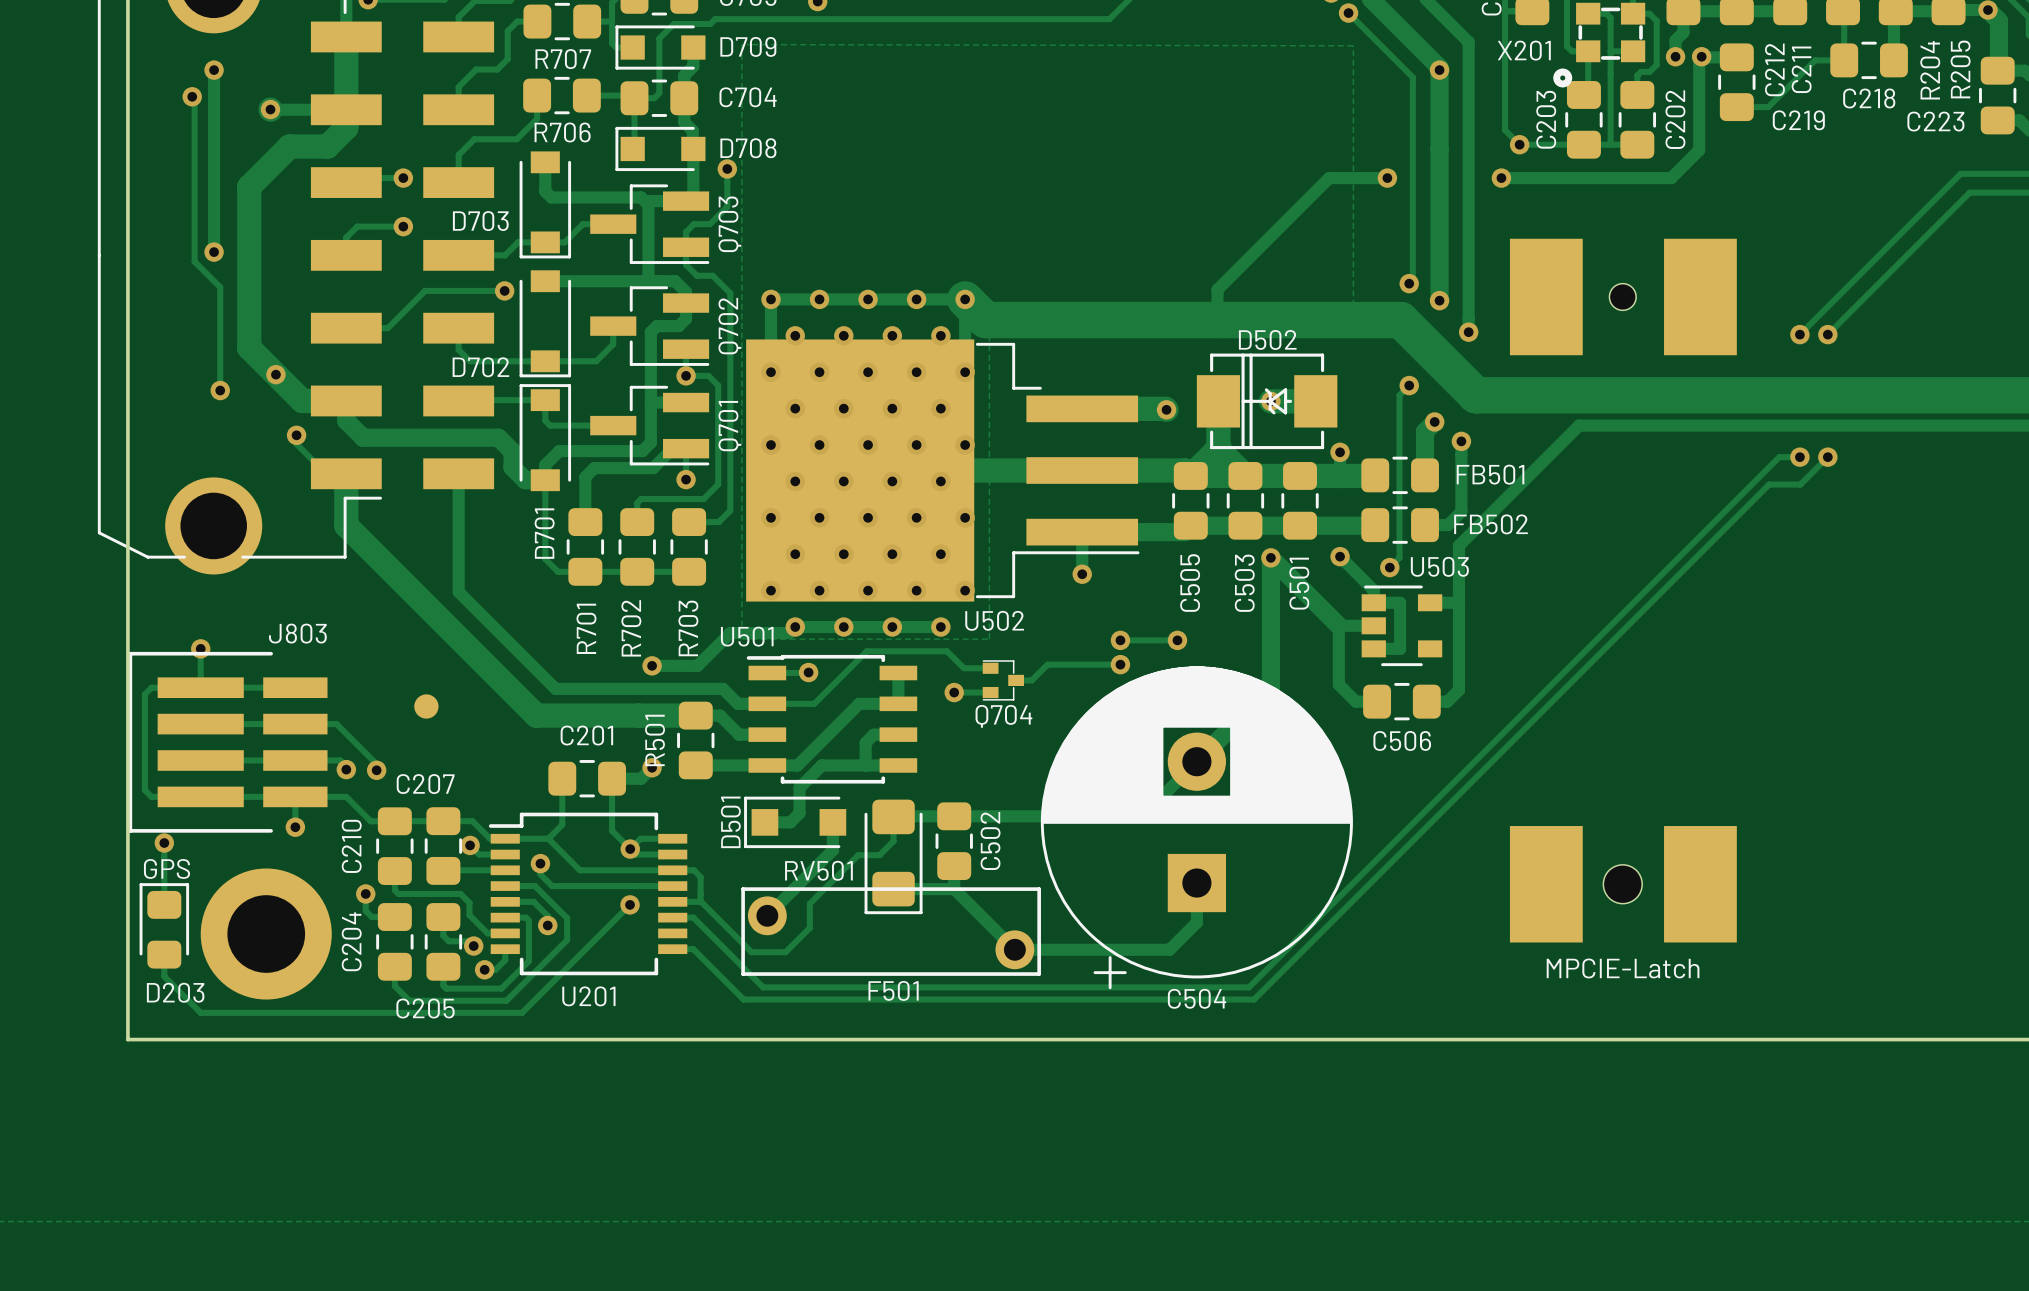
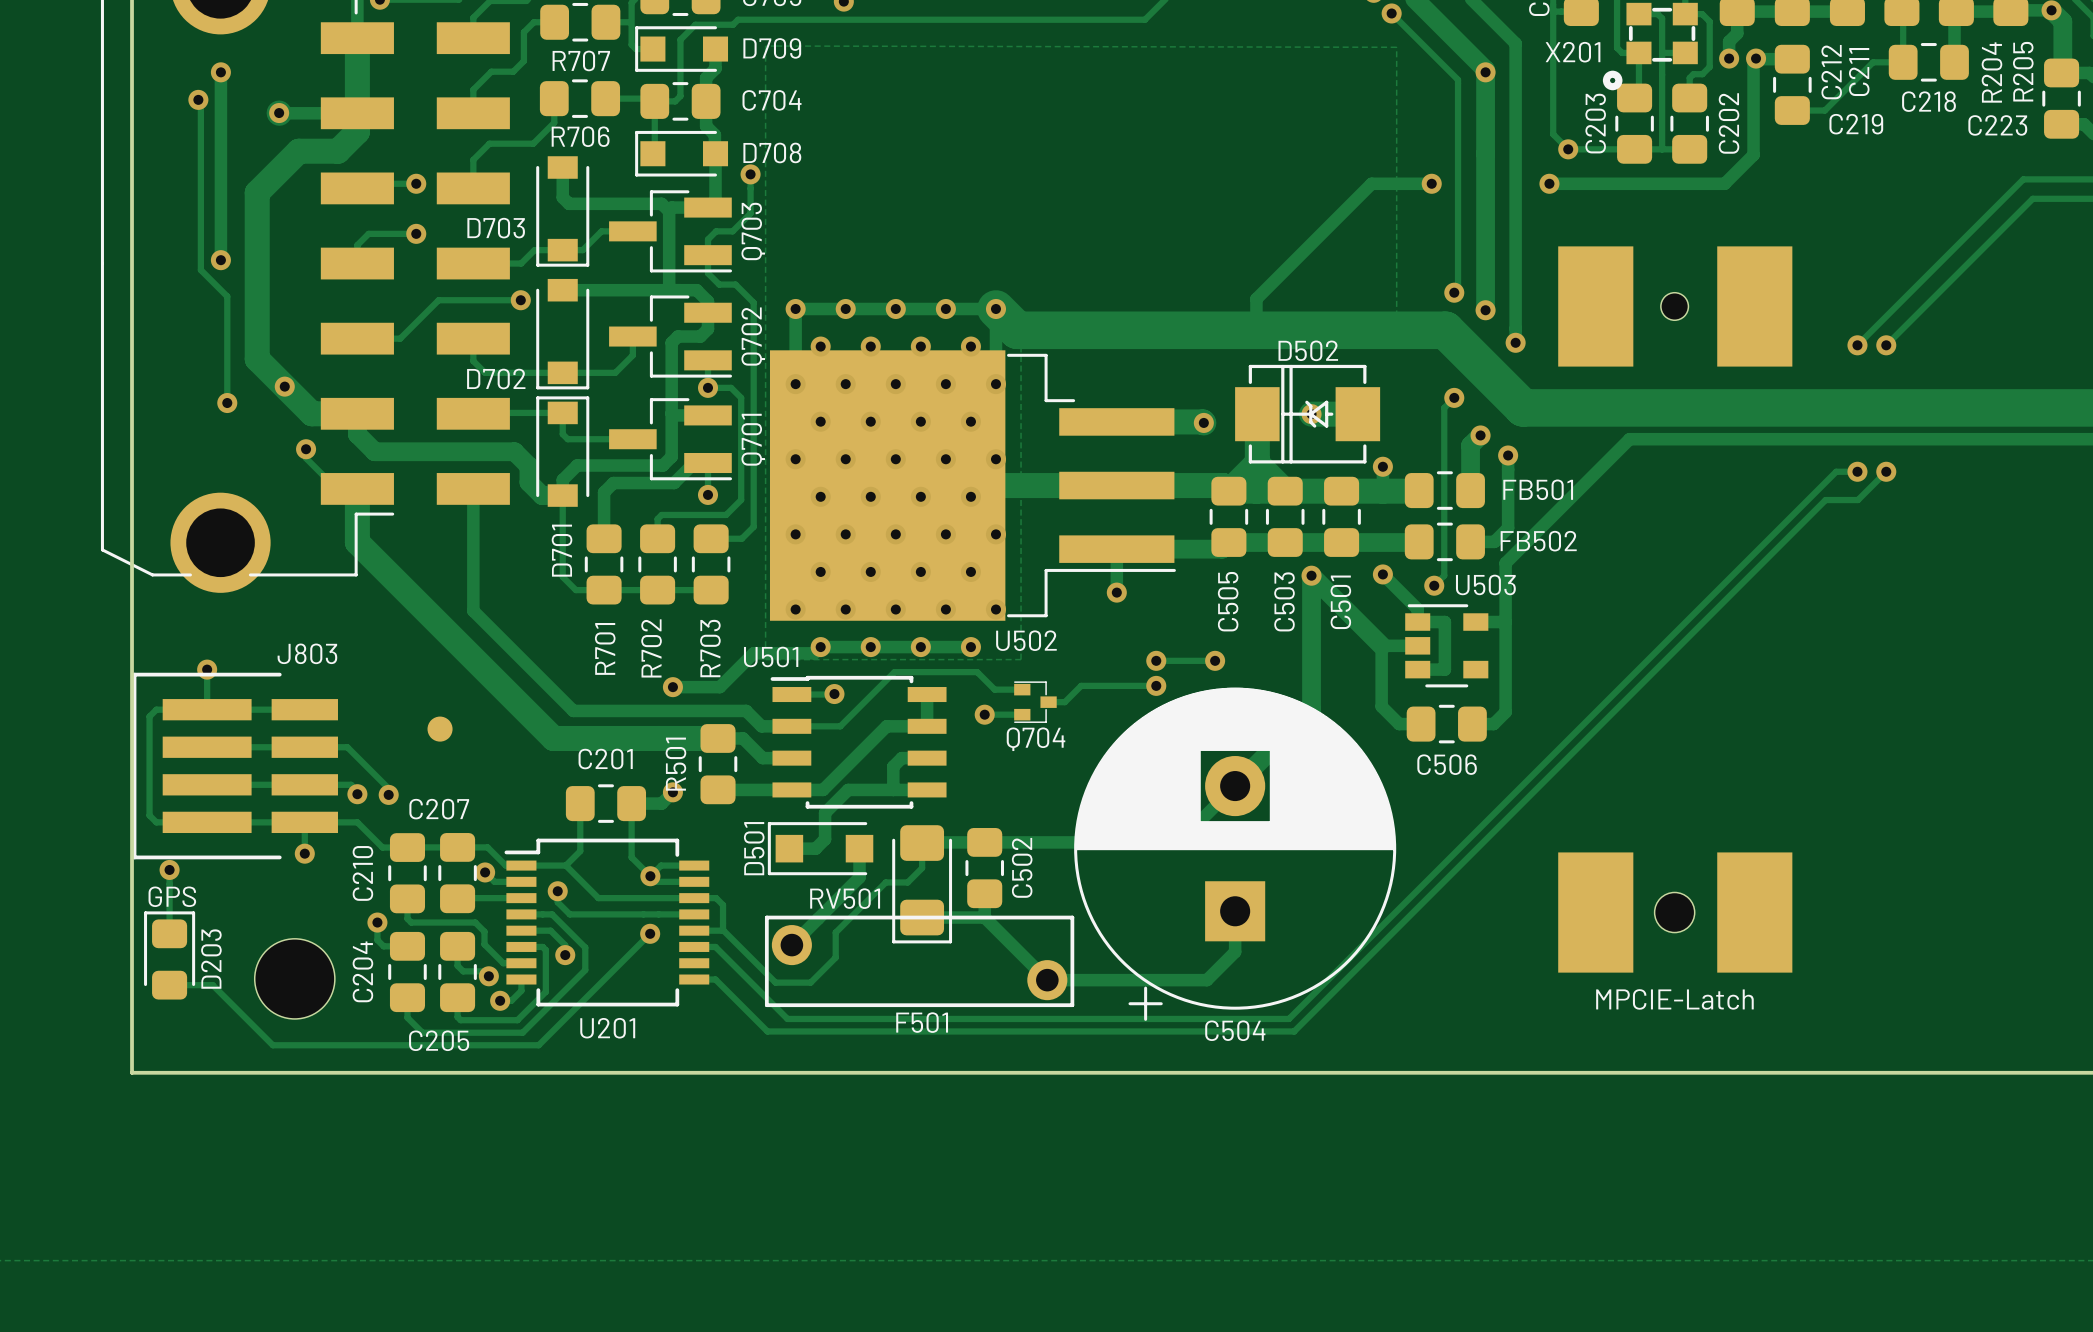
part footprint: [200, 868, 332, 1000] -> [254, 938, 335, 1019]
track: (164, 954) (164, 976) (200, 1012) (264, 1012) -> (169, 985) (212, 985) (272, 1045)
D203 name rotation: 0° (175, 992) -> 90° counterclockwise (211, 959)

